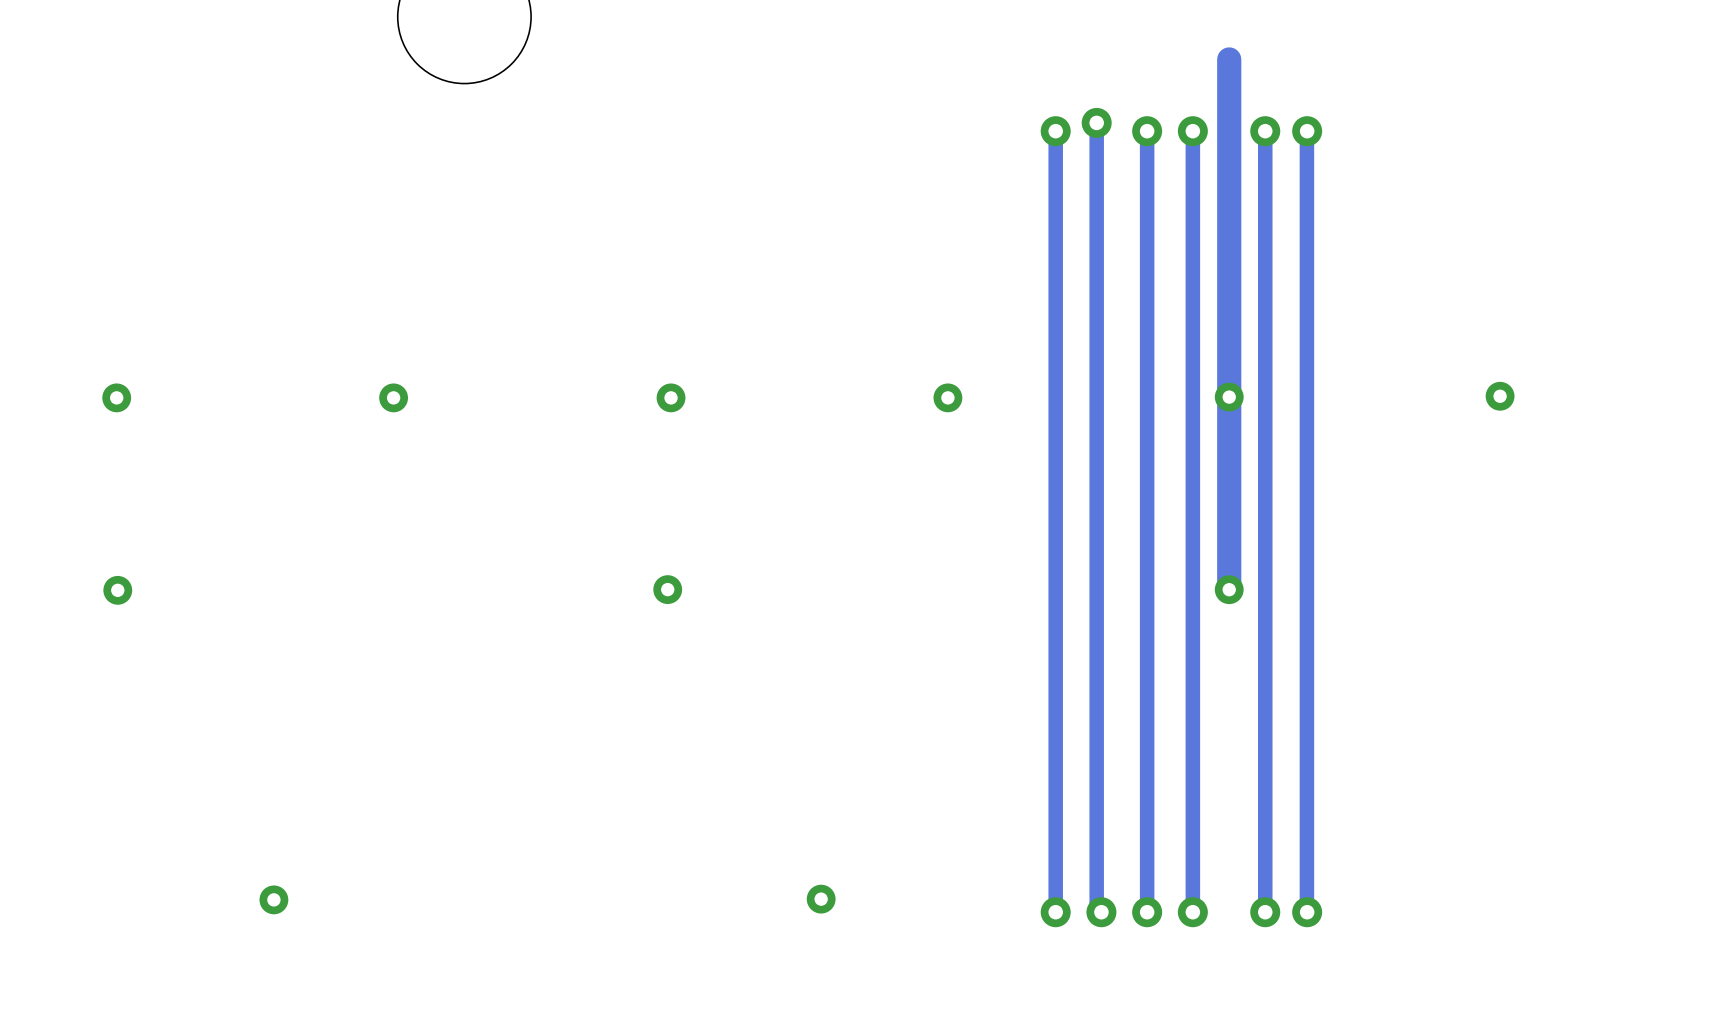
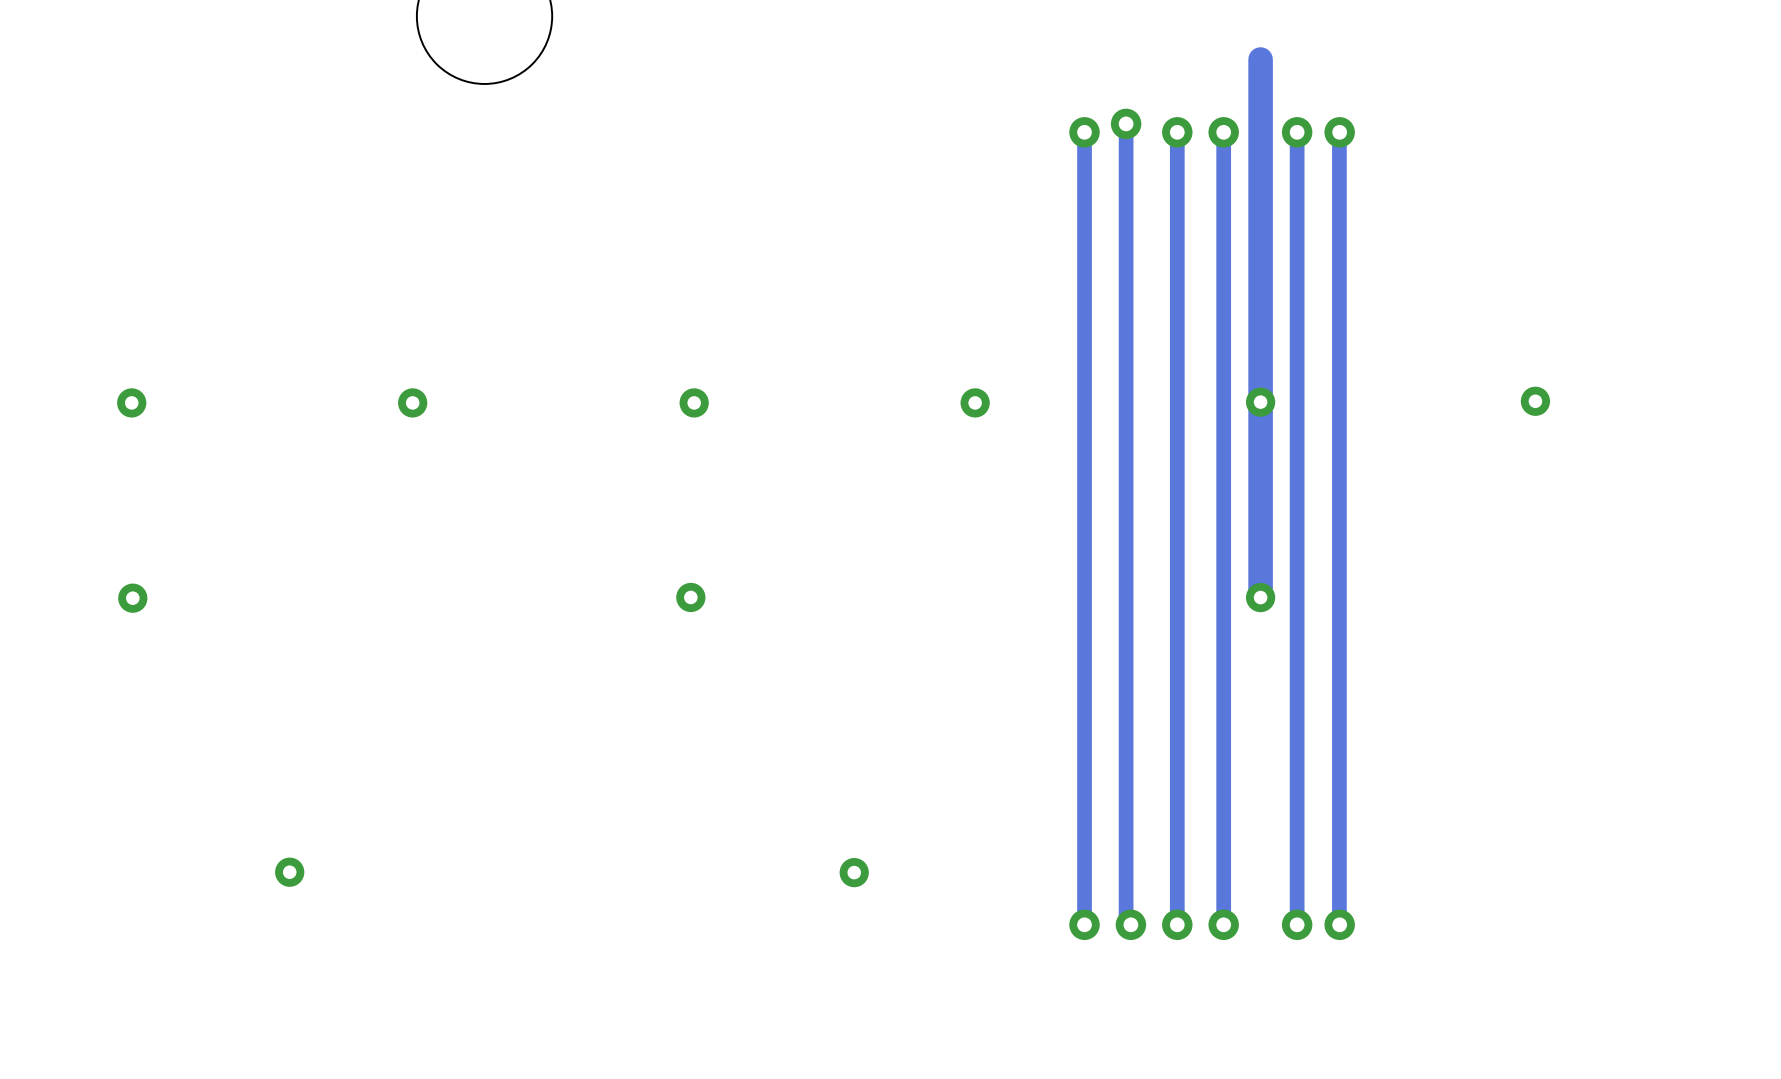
via position: (273, 899) -> (289, 872)
via position: (821, 899) -> (854, 872)

